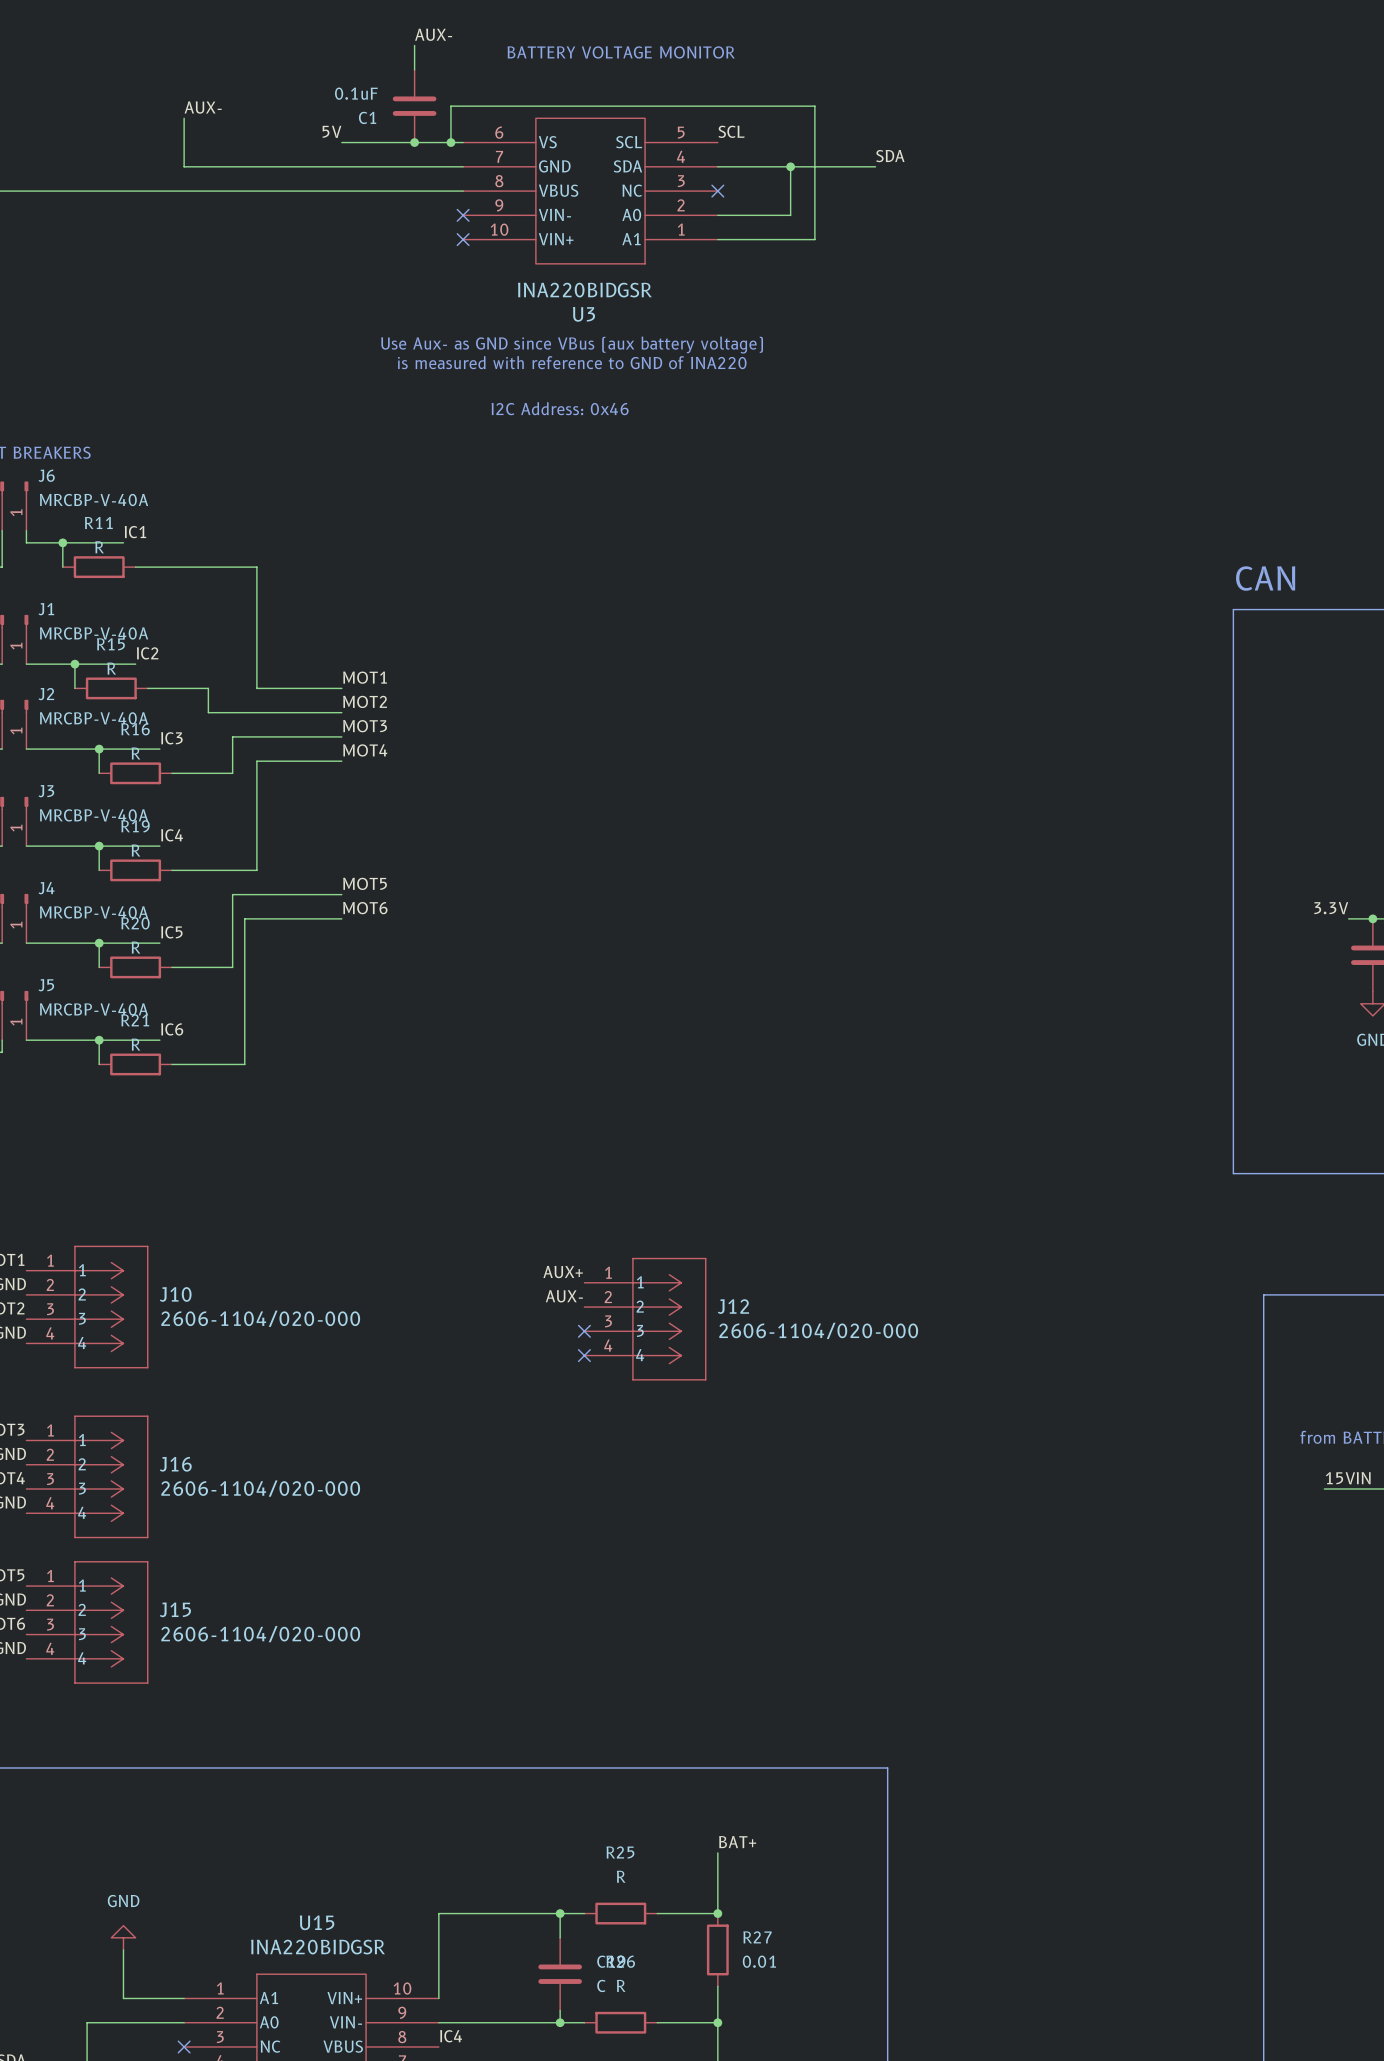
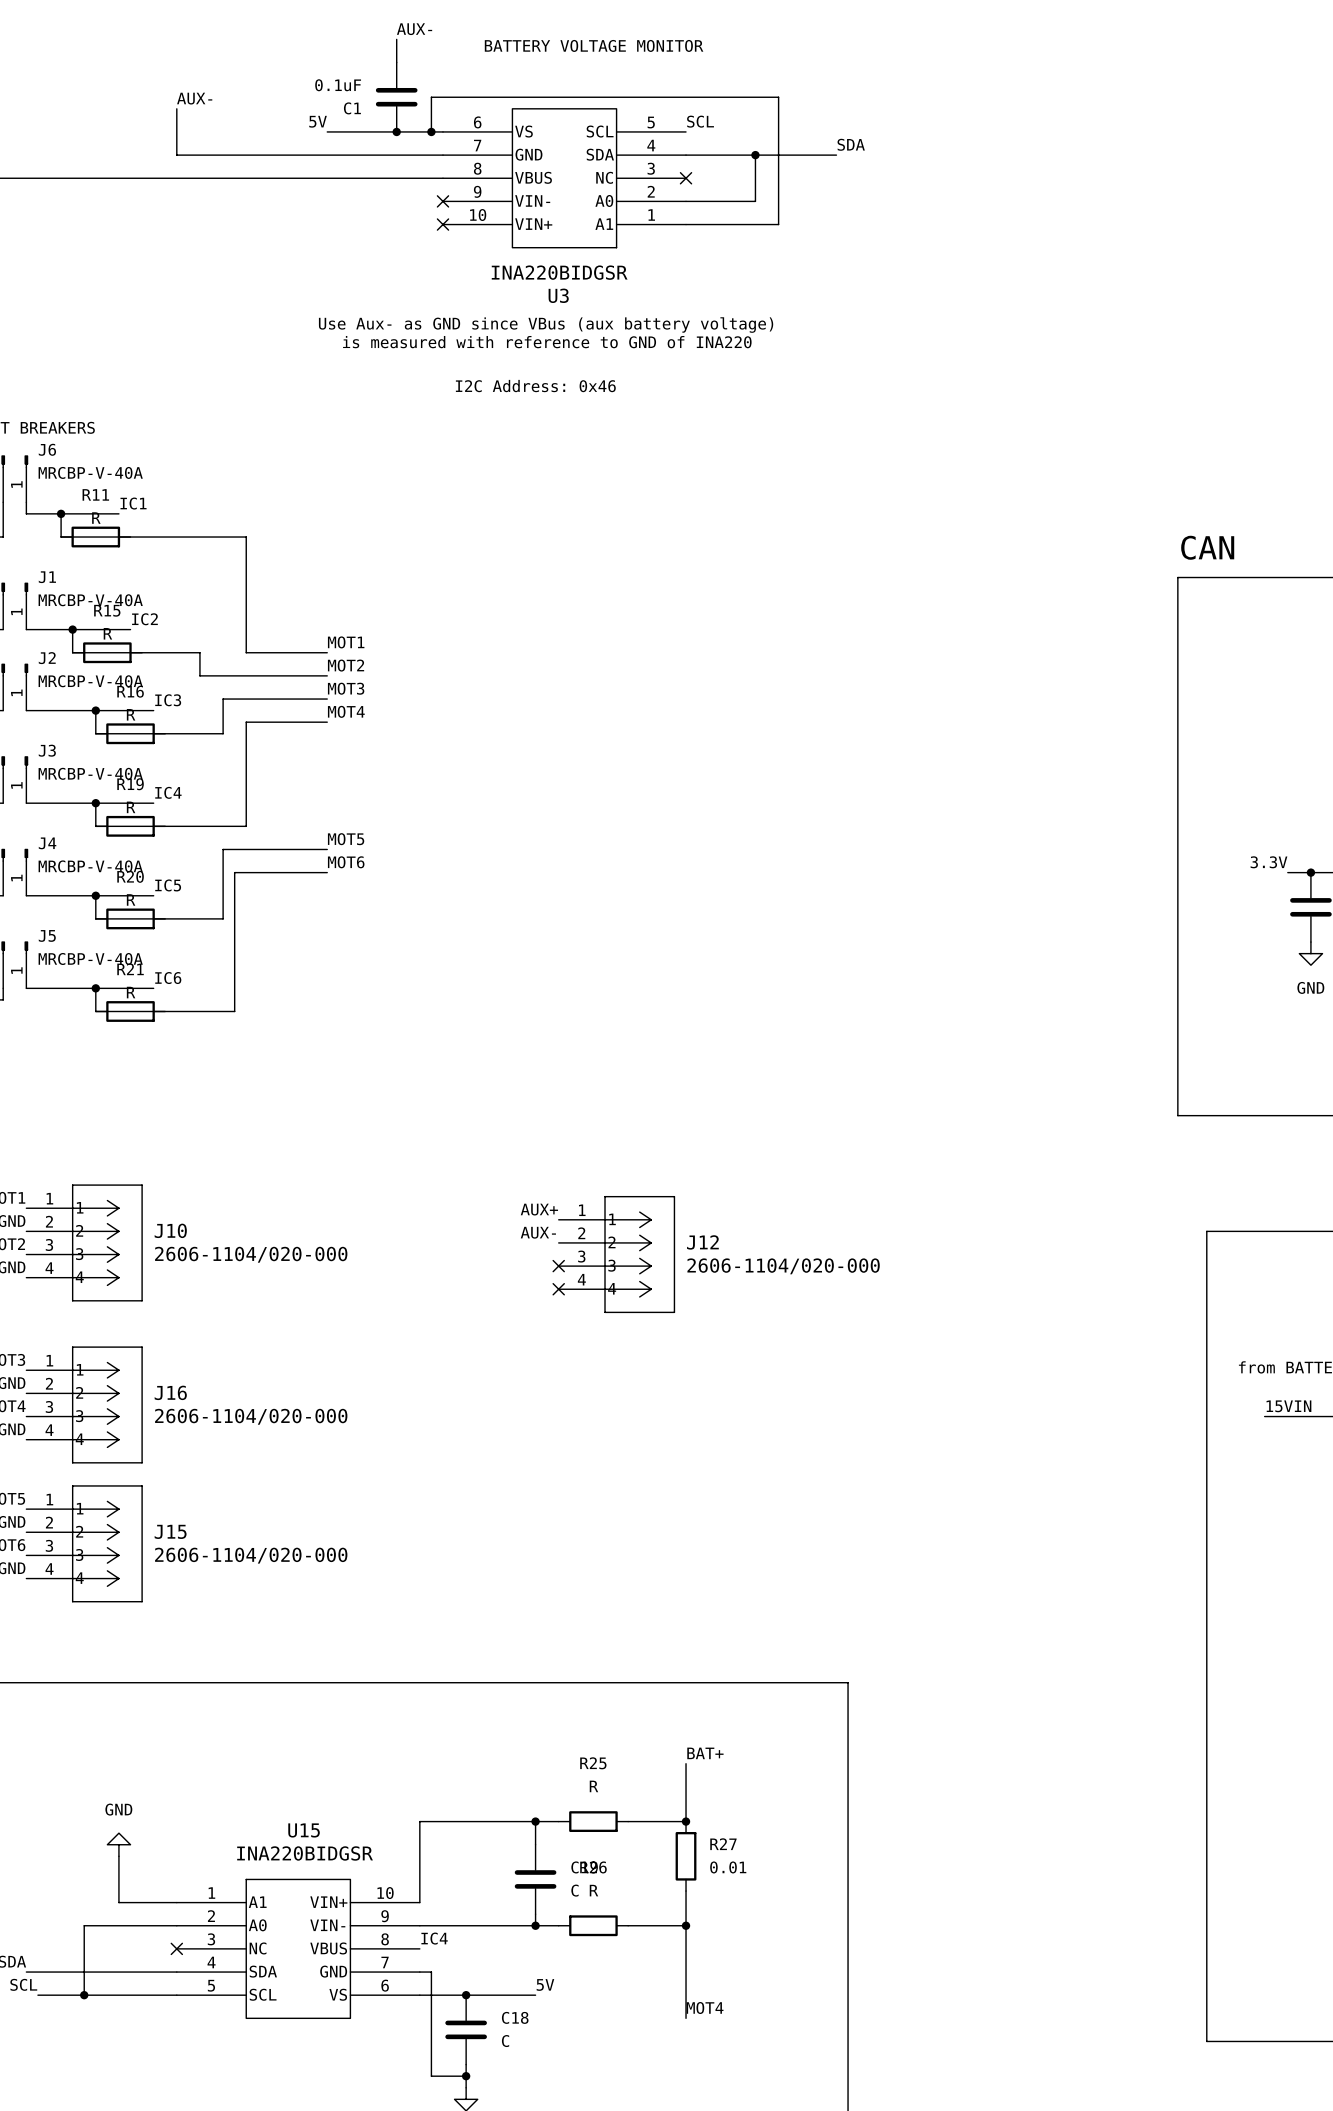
wire: none -> (61, 537) (130, 537)
wire: none -> (72, 652) (142, 652)
wire: none -> (95, 733) (165, 733)
wire: none -> (95, 826) (165, 826)
wire: none -> (95, 918) (165, 918)
wire: none -> (95, 1011) (165, 1011)

